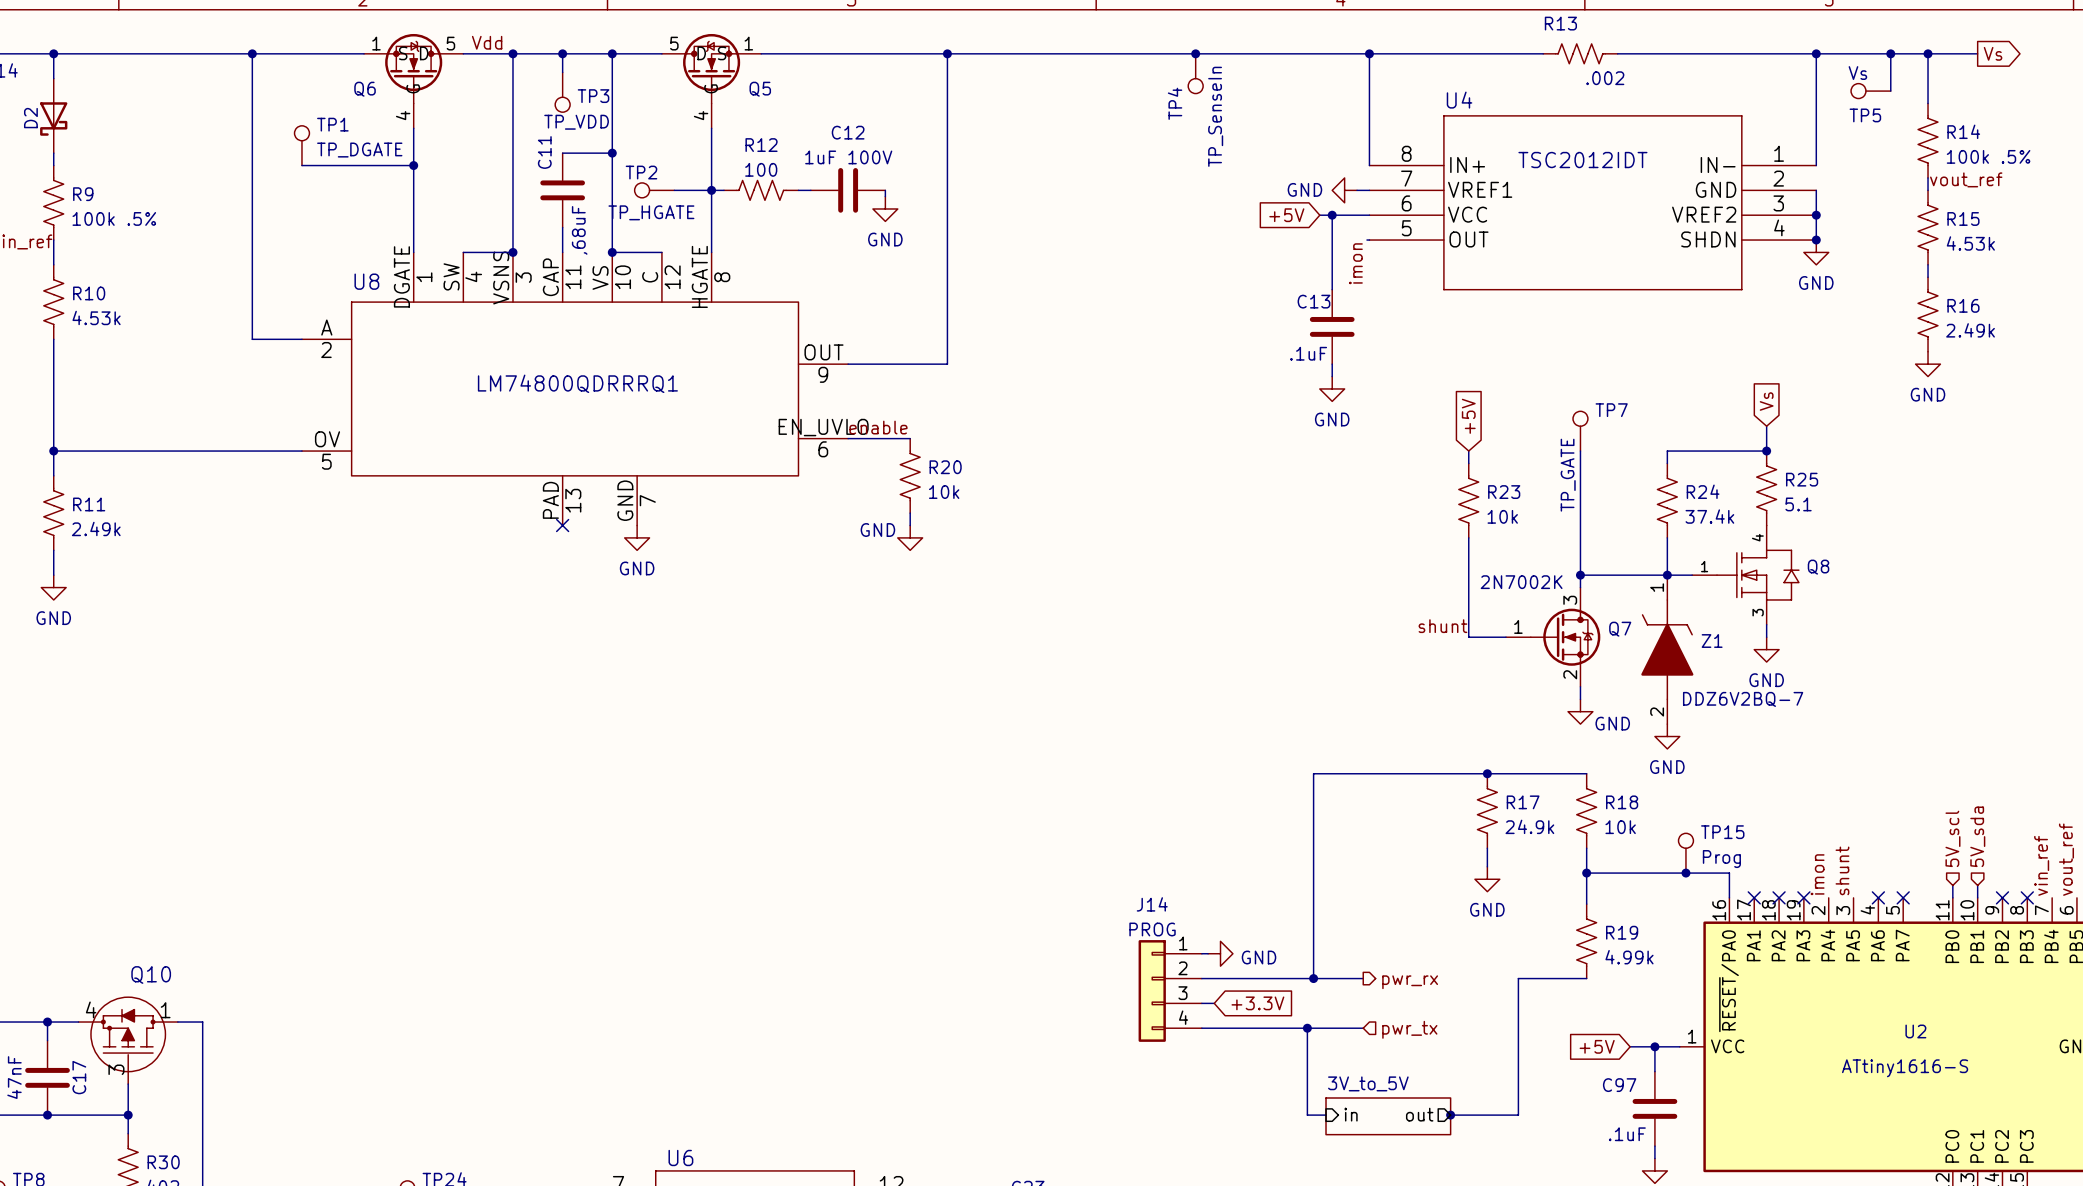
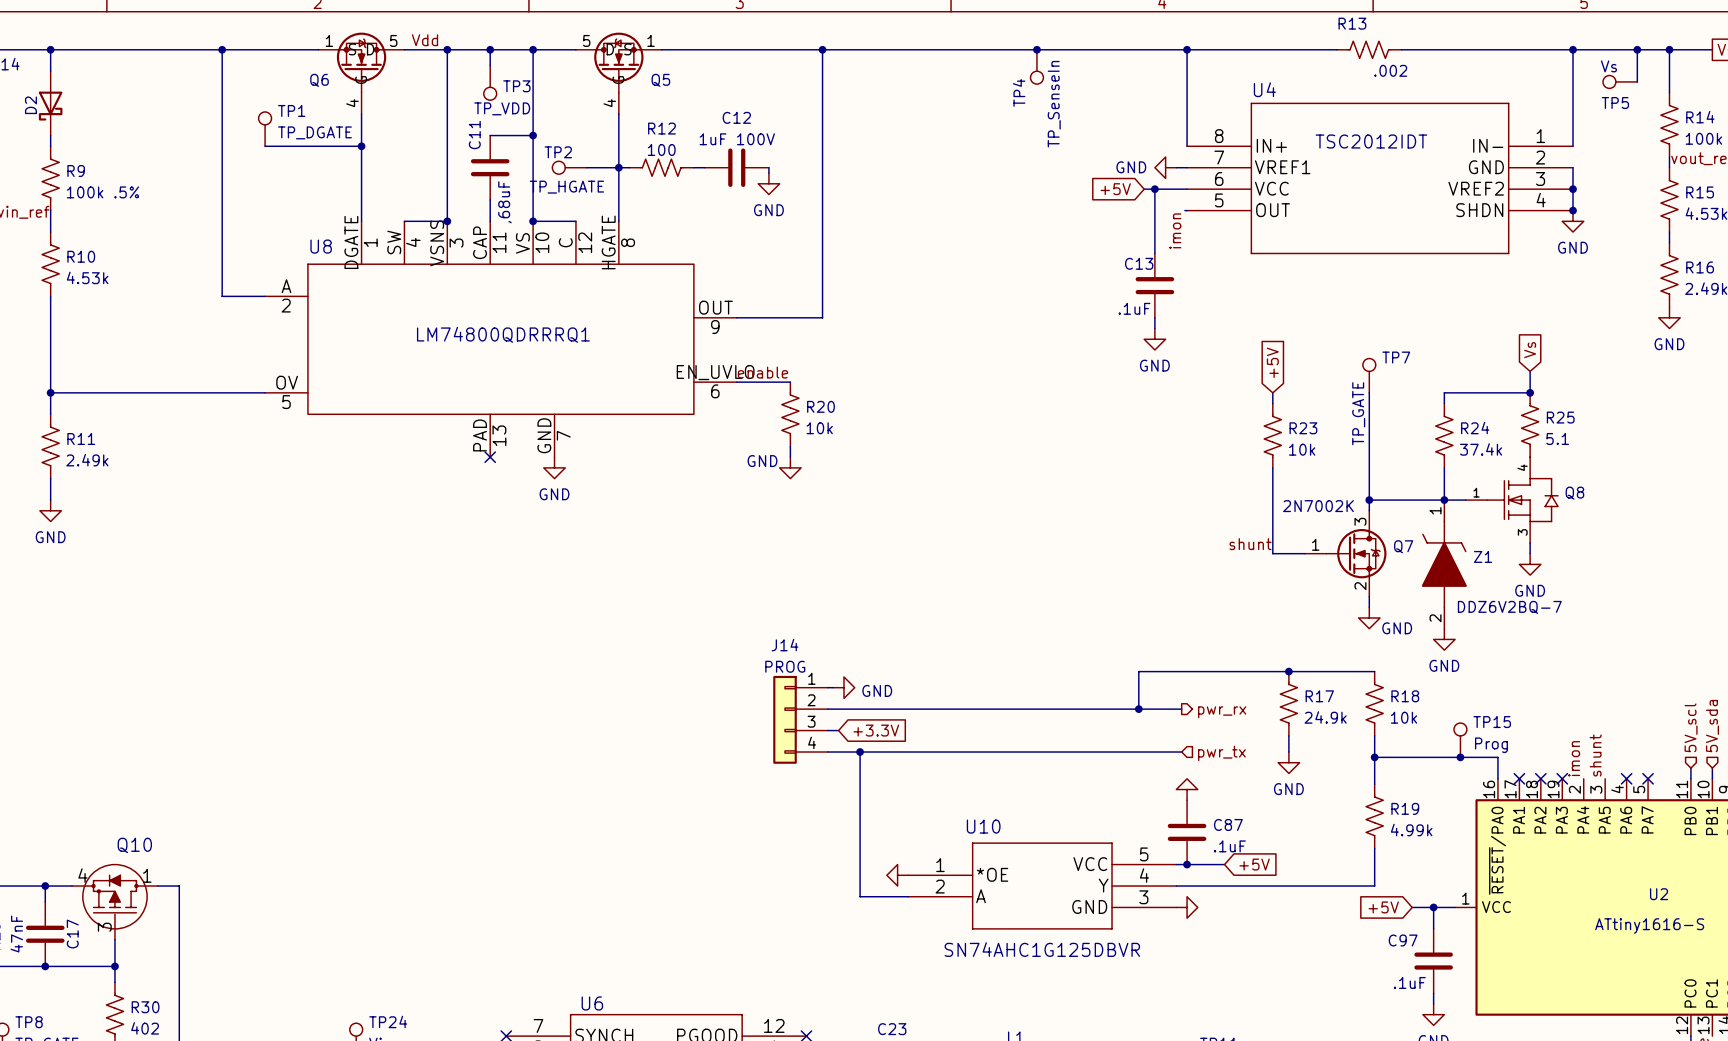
wire: none -> (827, 687) (833, 687)
power symbol: none -> GND (843, 687)
wire: none -> (827, 709) (1181, 709)
wire: (1313, 817) (1313, 978) -> none
junction: none -> (1138, 709)
wire: none -> (827, 730) (838, 730)
global label: none -> +3.3V (876, 730)
wire: none -> (827, 752) (1181, 752)
wire: none -> (860, 752) (860, 896) (908, 896)
junction: none -> (860, 752)
power symbol: none -> (1187, 789)
wire: (1201, 953) (1208, 953) -> none
power symbol: GND (1220, 953) -> none
C87: none -> .1uF (1187, 832)
wire: (1201, 978) (1363, 978) -> none
junction: (1313, 978) -> none
wire: (1586, 978) (1518, 978) (1518, 1115) (1450, 1115) -> (1374, 848) (1374, 886) (1176, 886)
hierarchical label position: pwr_rx (1410, 982) -> pwr_rx (1222, 712)
J14 position: (1170, 990) -> (800, 719)
wire: none -> (1176, 864) (1224, 864)
junction: none -> (1187, 864)
global label: none -> +5V (1254, 864)
wire: (1201, 1003) (1214, 1003) -> none
global label: +3.3V (1257, 1003) -> none
power symbol: none -> (897, 875)
U10: none -> SN74AHC1G125DBVR (1042, 886)
wire: (1201, 1028) (1363, 1028) -> none
wire: (1307, 1028) (1307, 1115) (1326, 1115) -> none
junction: (1307, 1028) -> none
hierarchical label position: pwr_tx (1409, 1029) -> pwr_tx (1221, 753)
power symbol: none -> (1187, 907)
sheet pin: in (1351, 1114) -> none
sheet pin: out (1419, 1114) -> none
junction: (1450, 1115) -> none
sheet 3V_to_5V: (1388, 1116) -> none

